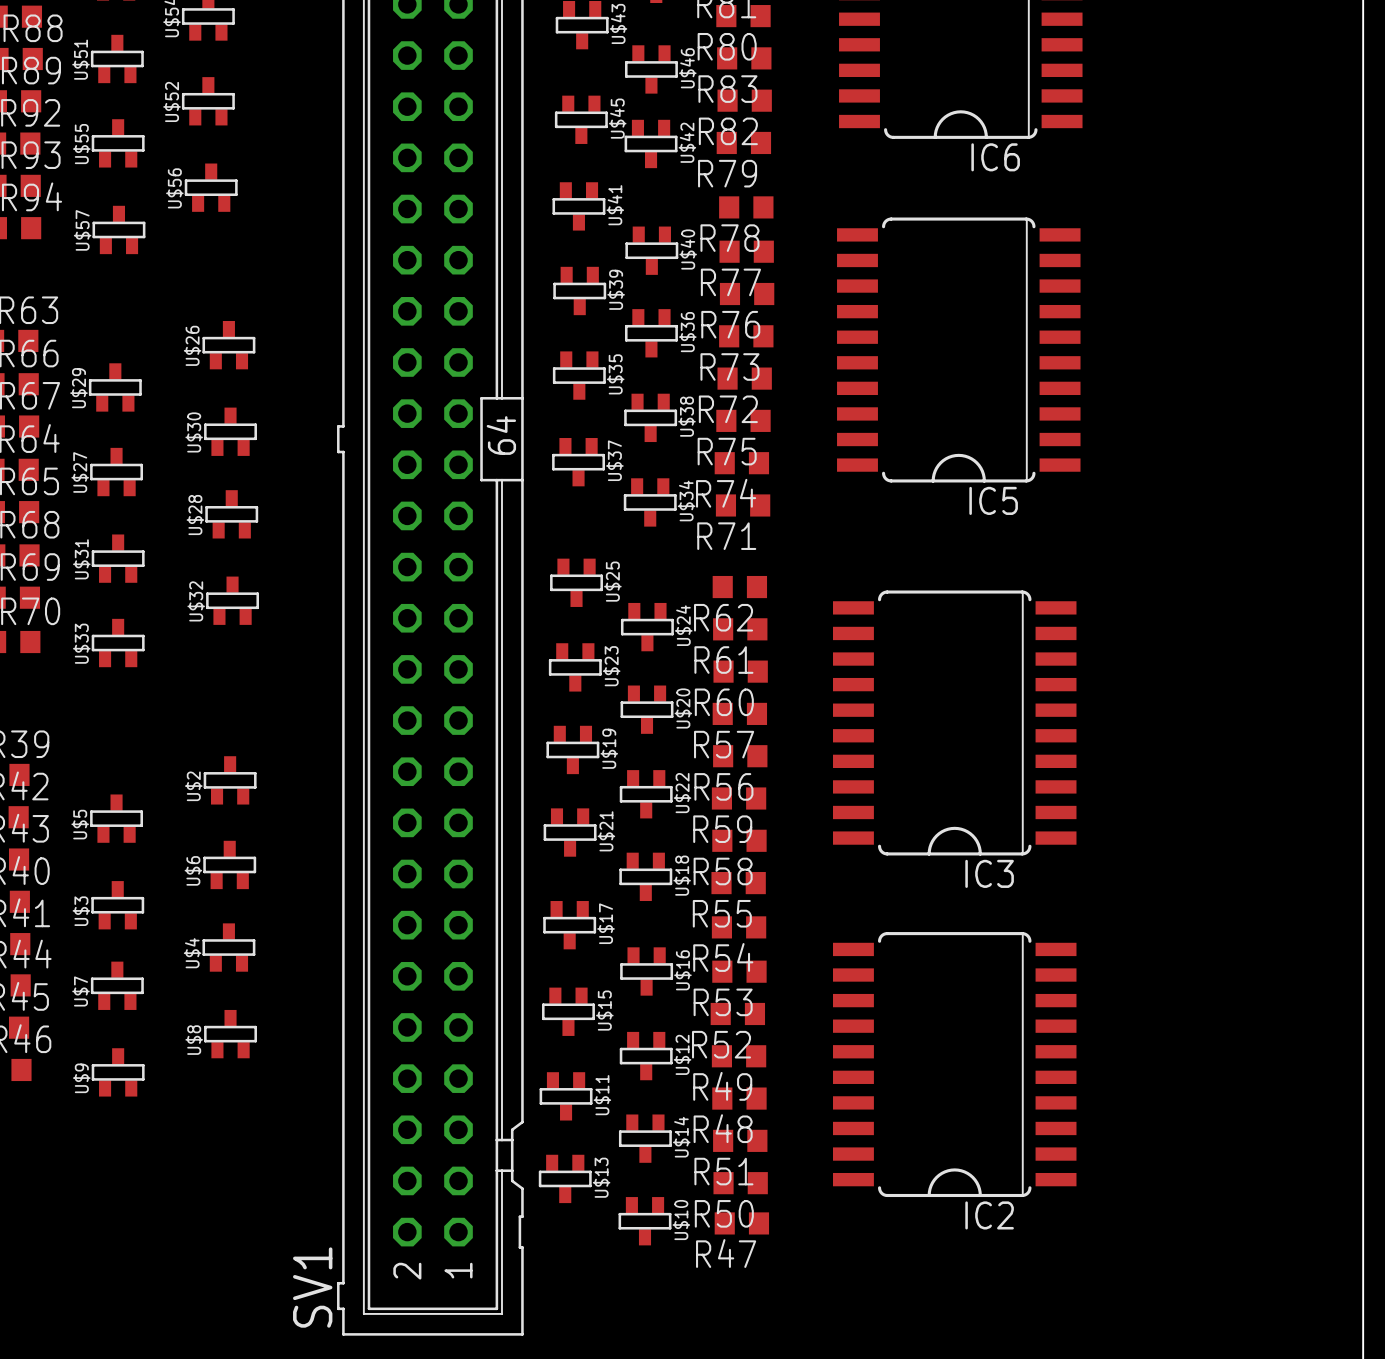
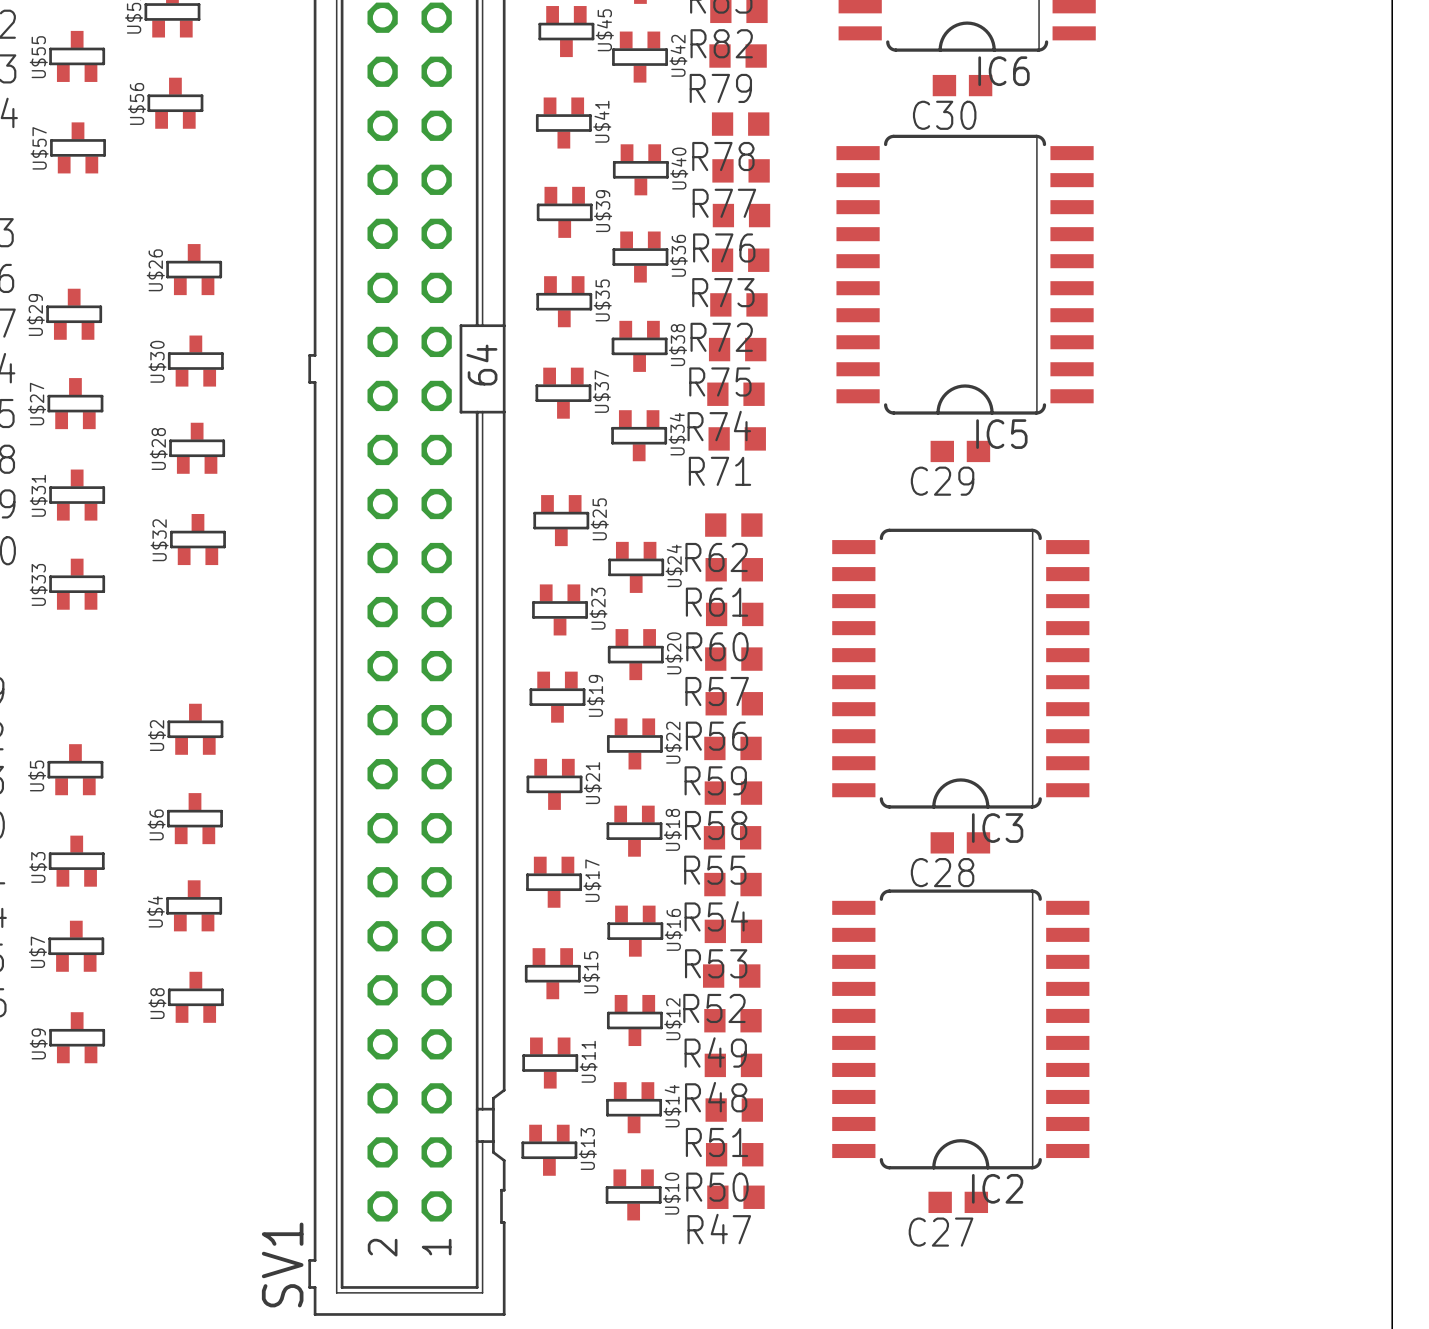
C30: none -> (962, 85)
C29: none -> (960, 451)
C28: none -> (960, 842)
C27: none -> (958, 1202)

